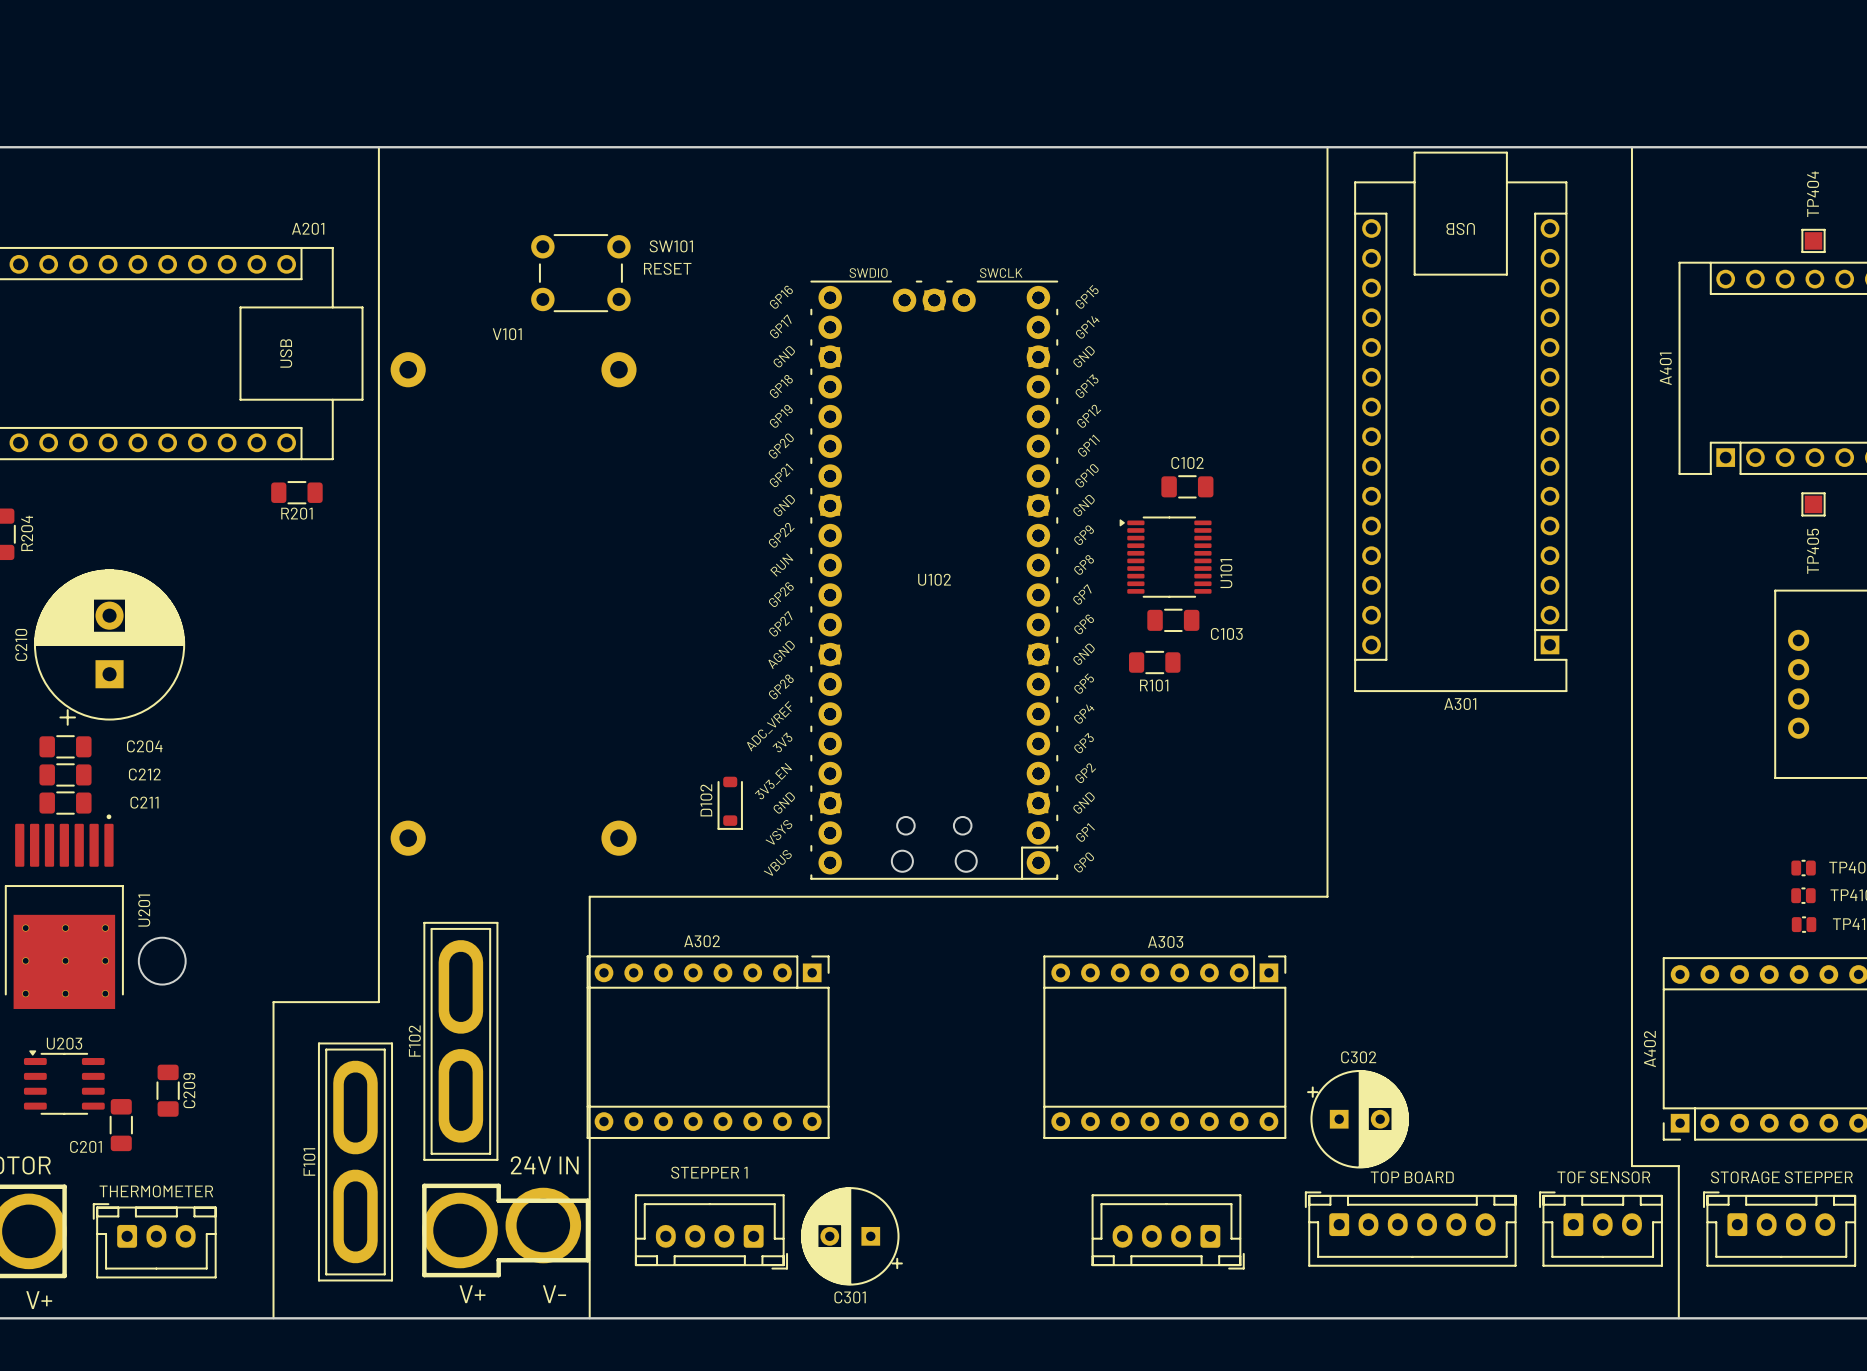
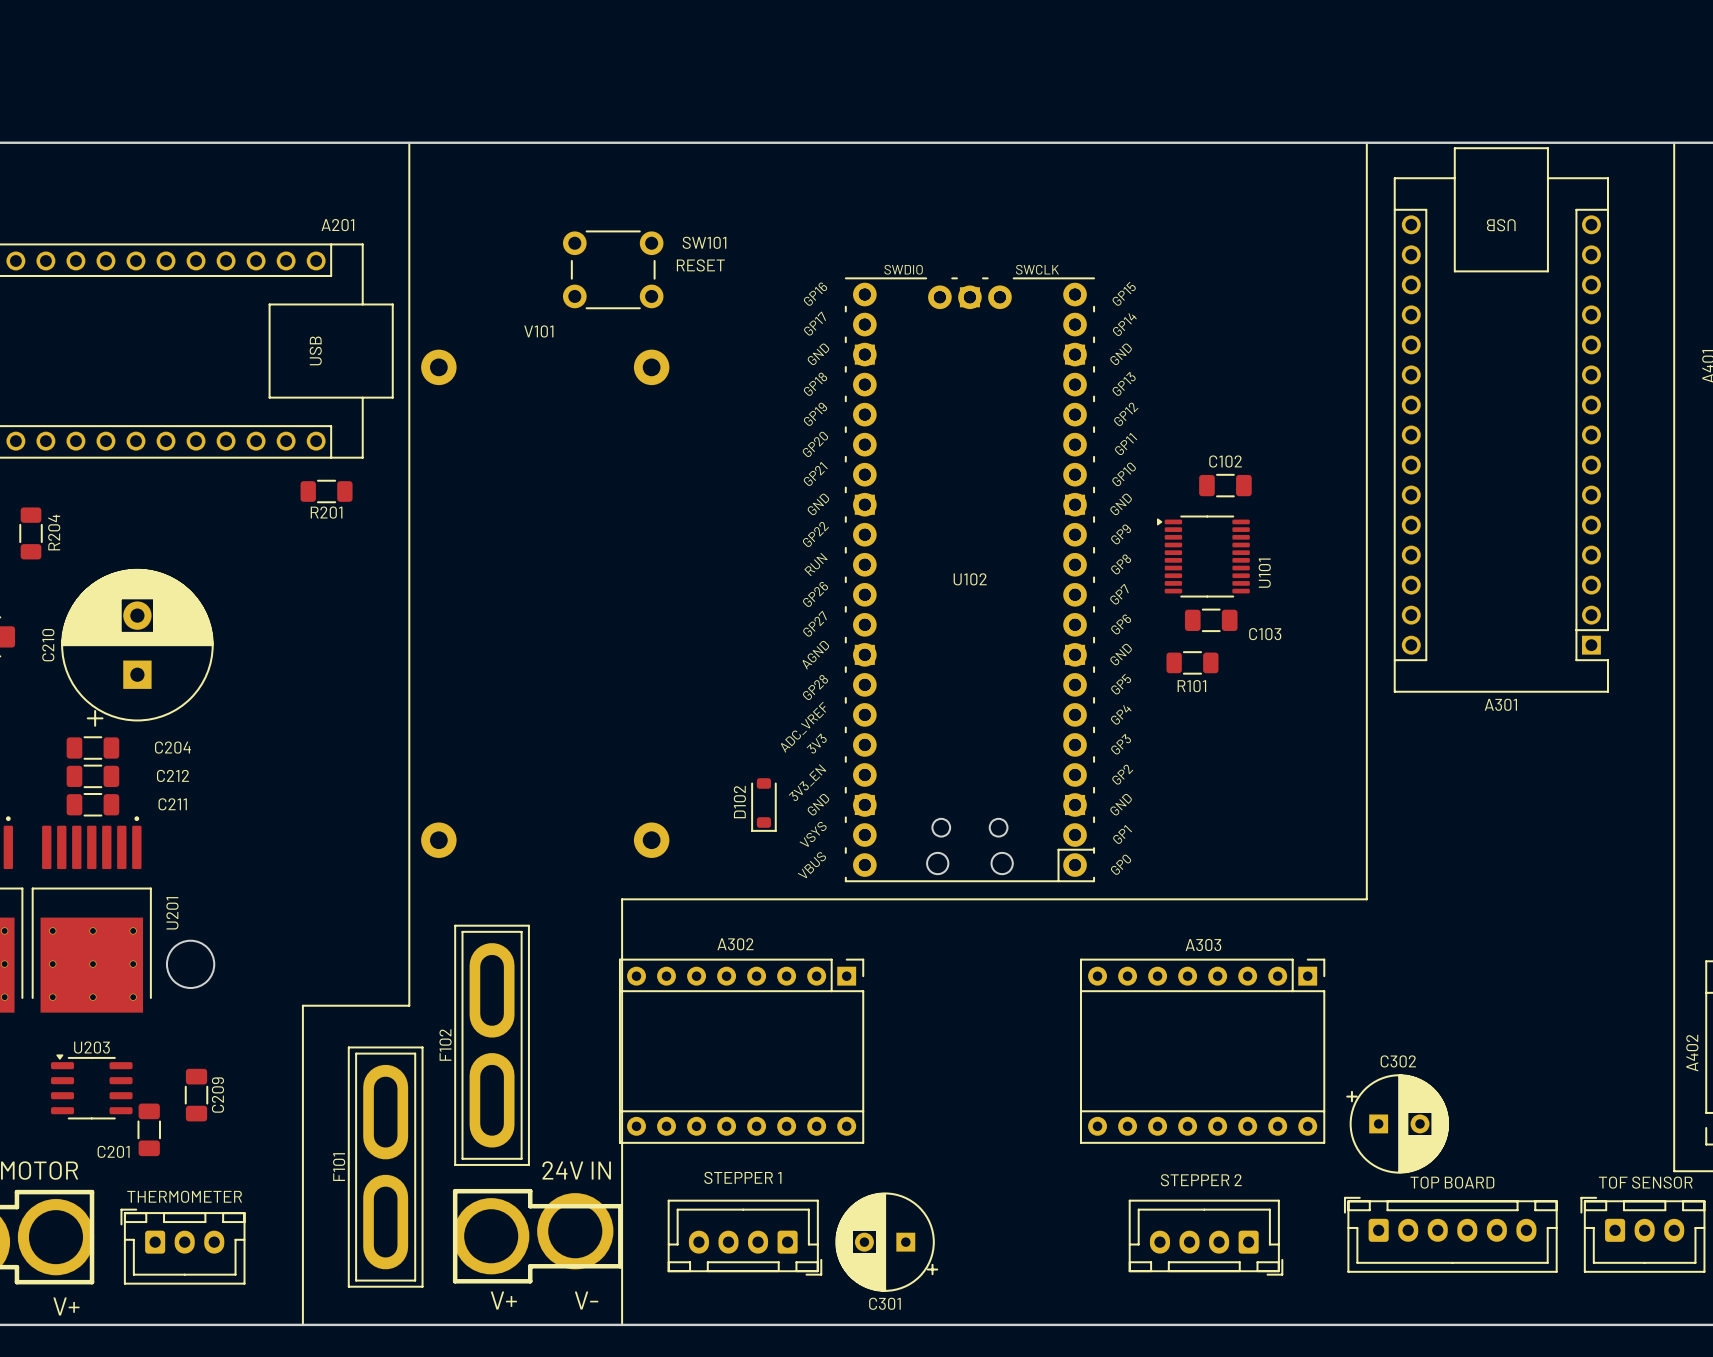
part value: none -> STEPPER 2 (1201, 1180)

